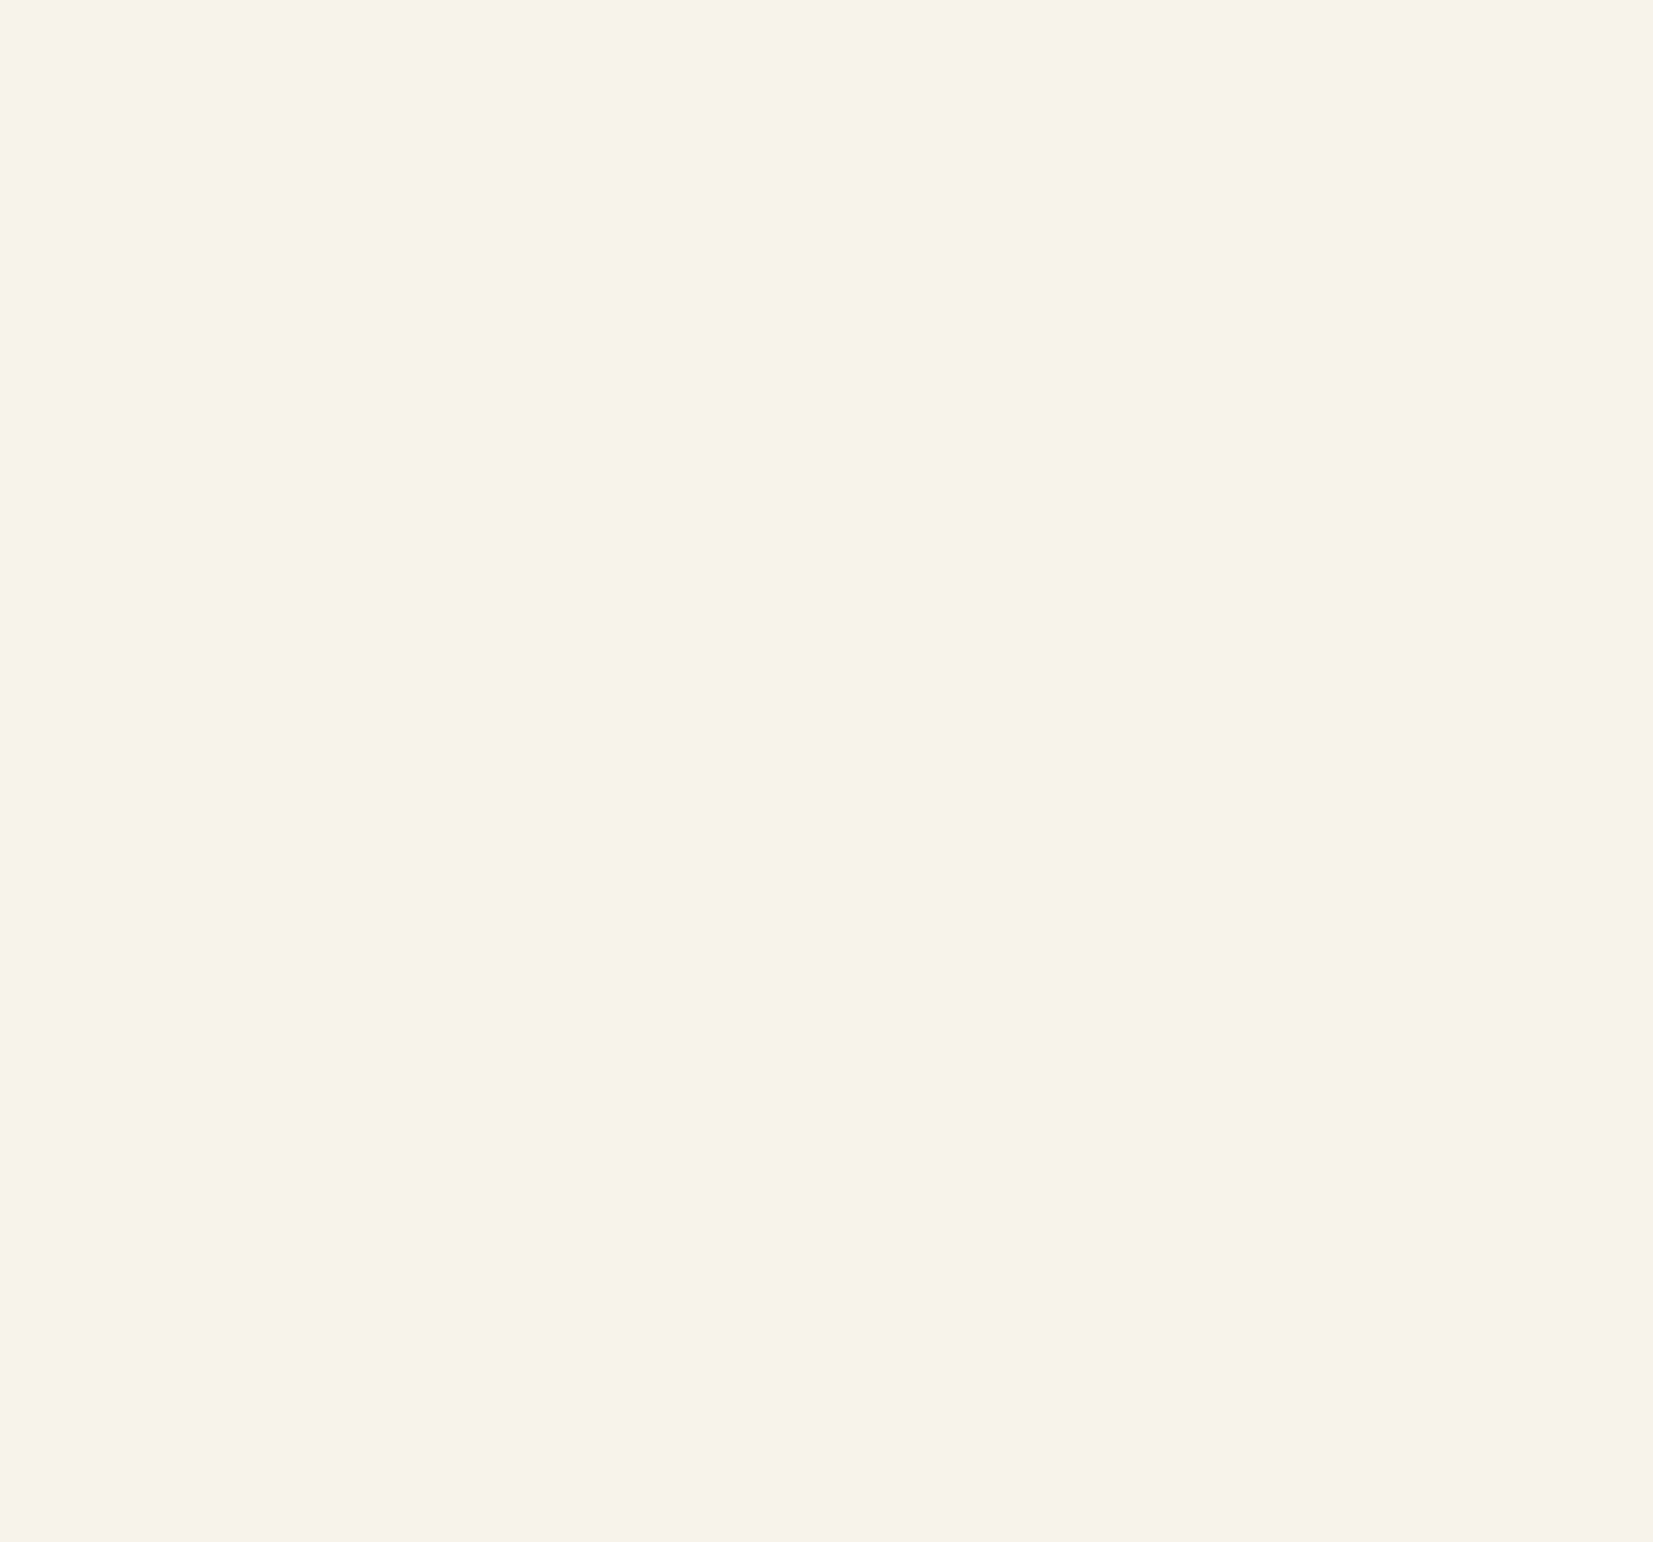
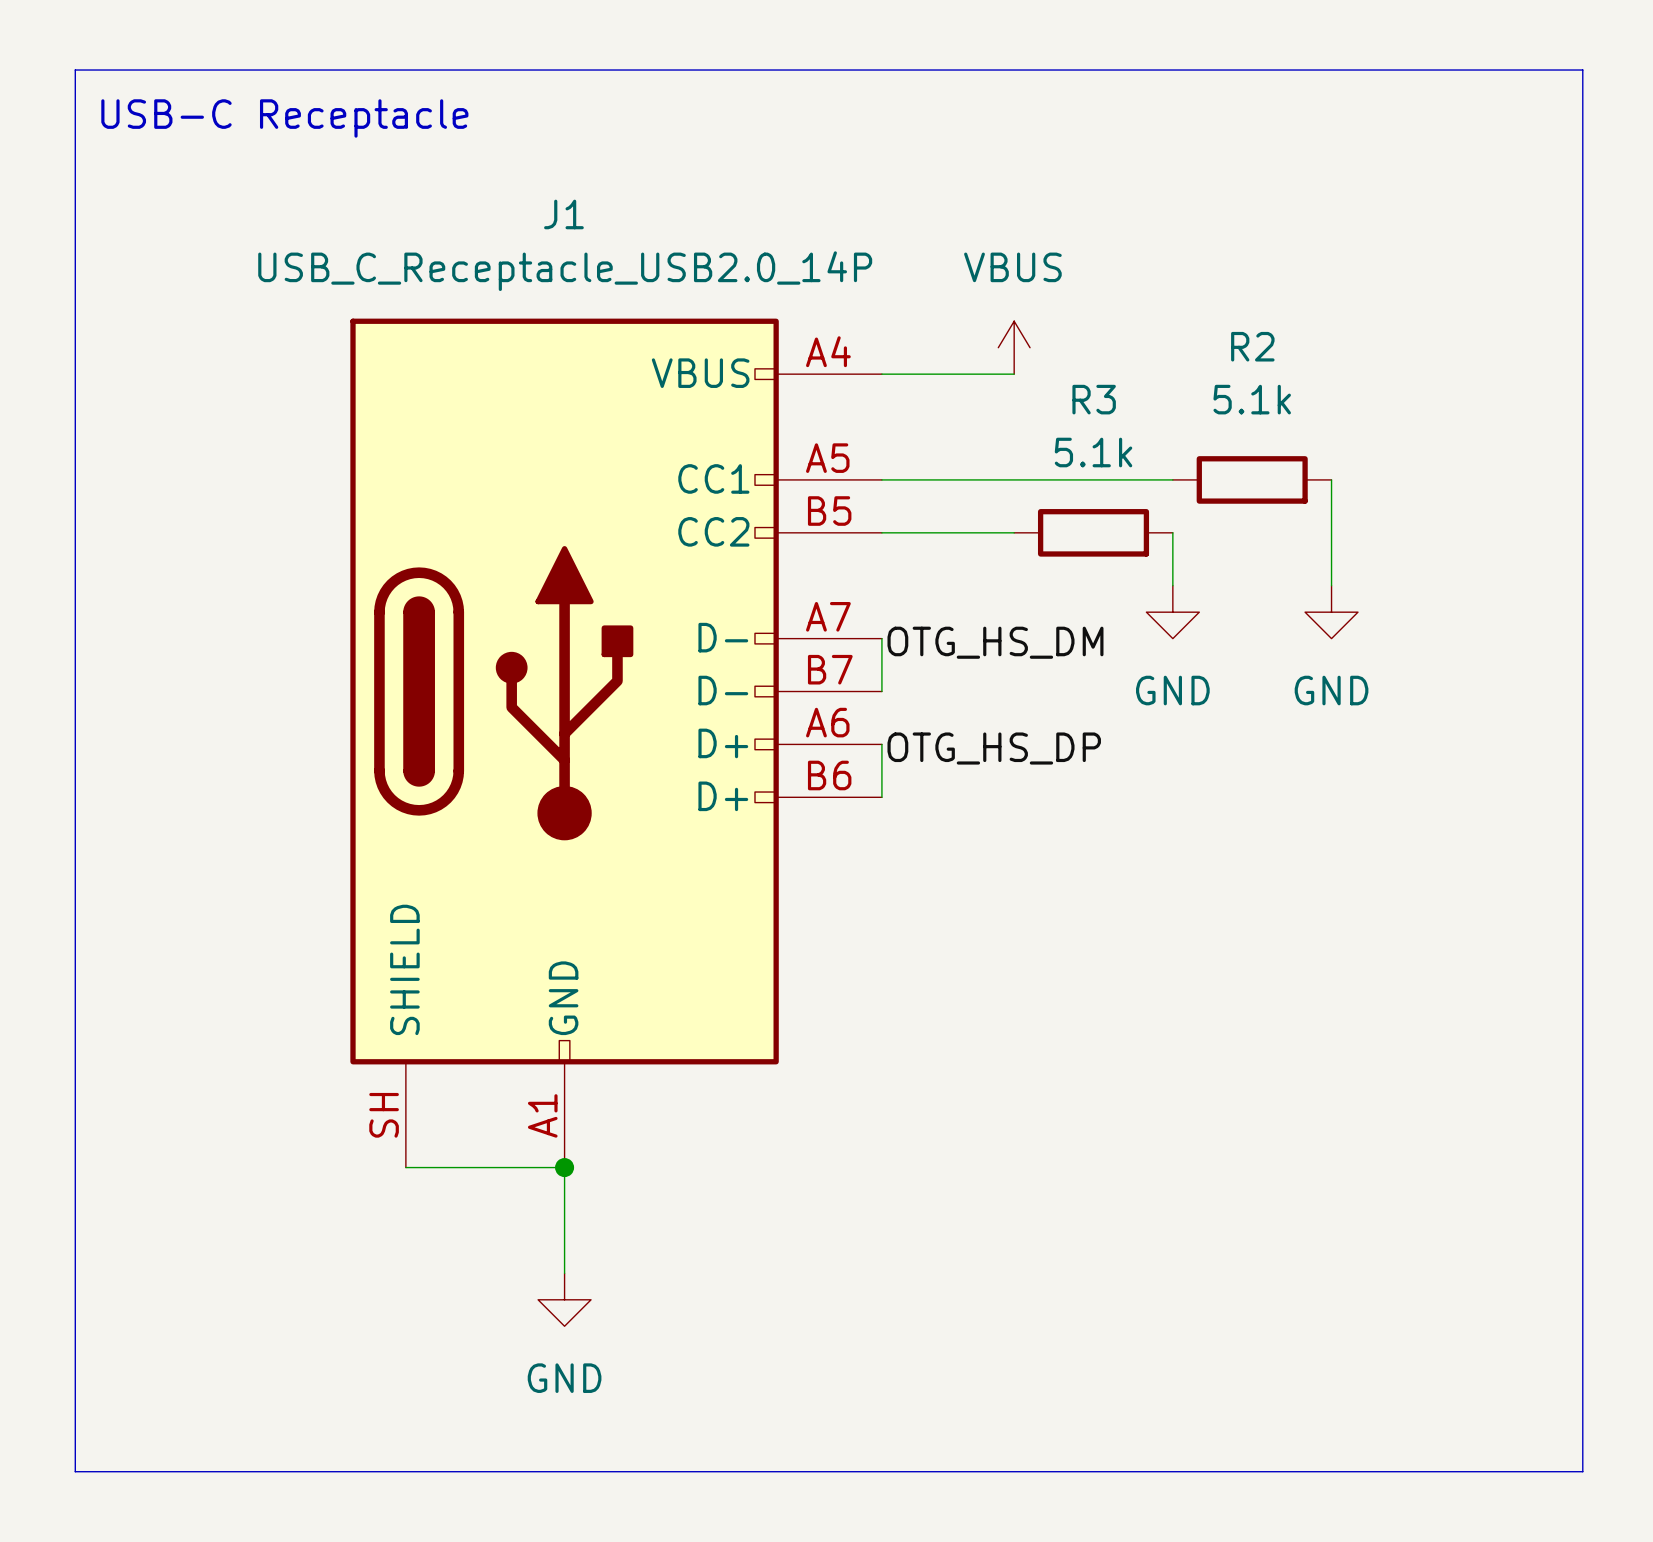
line: none -> (75, 70) (1582, 70) (1582, 1471) (75, 1471) (75, 70)
text: none -> USB-C Receptacle (284, 118)
power symbol: none -> VBUS (1014, 347)
wire: none -> (881, 374) (1014, 374)
wire: none -> (881, 479) (1172, 479)
R2: none -> 5.1k (1252, 479)
wire: none -> (1331, 479) (1331, 585)
wire: none -> (881, 532) (1014, 532)
R3: none -> 5.1k (1093, 532)
wire: none -> (1172, 532) (1172, 585)
power symbol: none -> GND (1172, 612)
power symbol: none -> GND (1331, 612)
wire: none -> (881, 638) (881, 691)
label: none -> OTG_HS_DM (995, 642)
J1: none -> USB_C_Receptacle_USB2.0_14P (616, 743)
wire: none -> (881, 744) (881, 797)
label: none -> OTG_HS_DP (994, 748)
wire: none -> (405, 1167) (564, 1167) (564, 1273)
junction: none -> (564, 1167)
power symbol: none -> GND (564, 1299)

